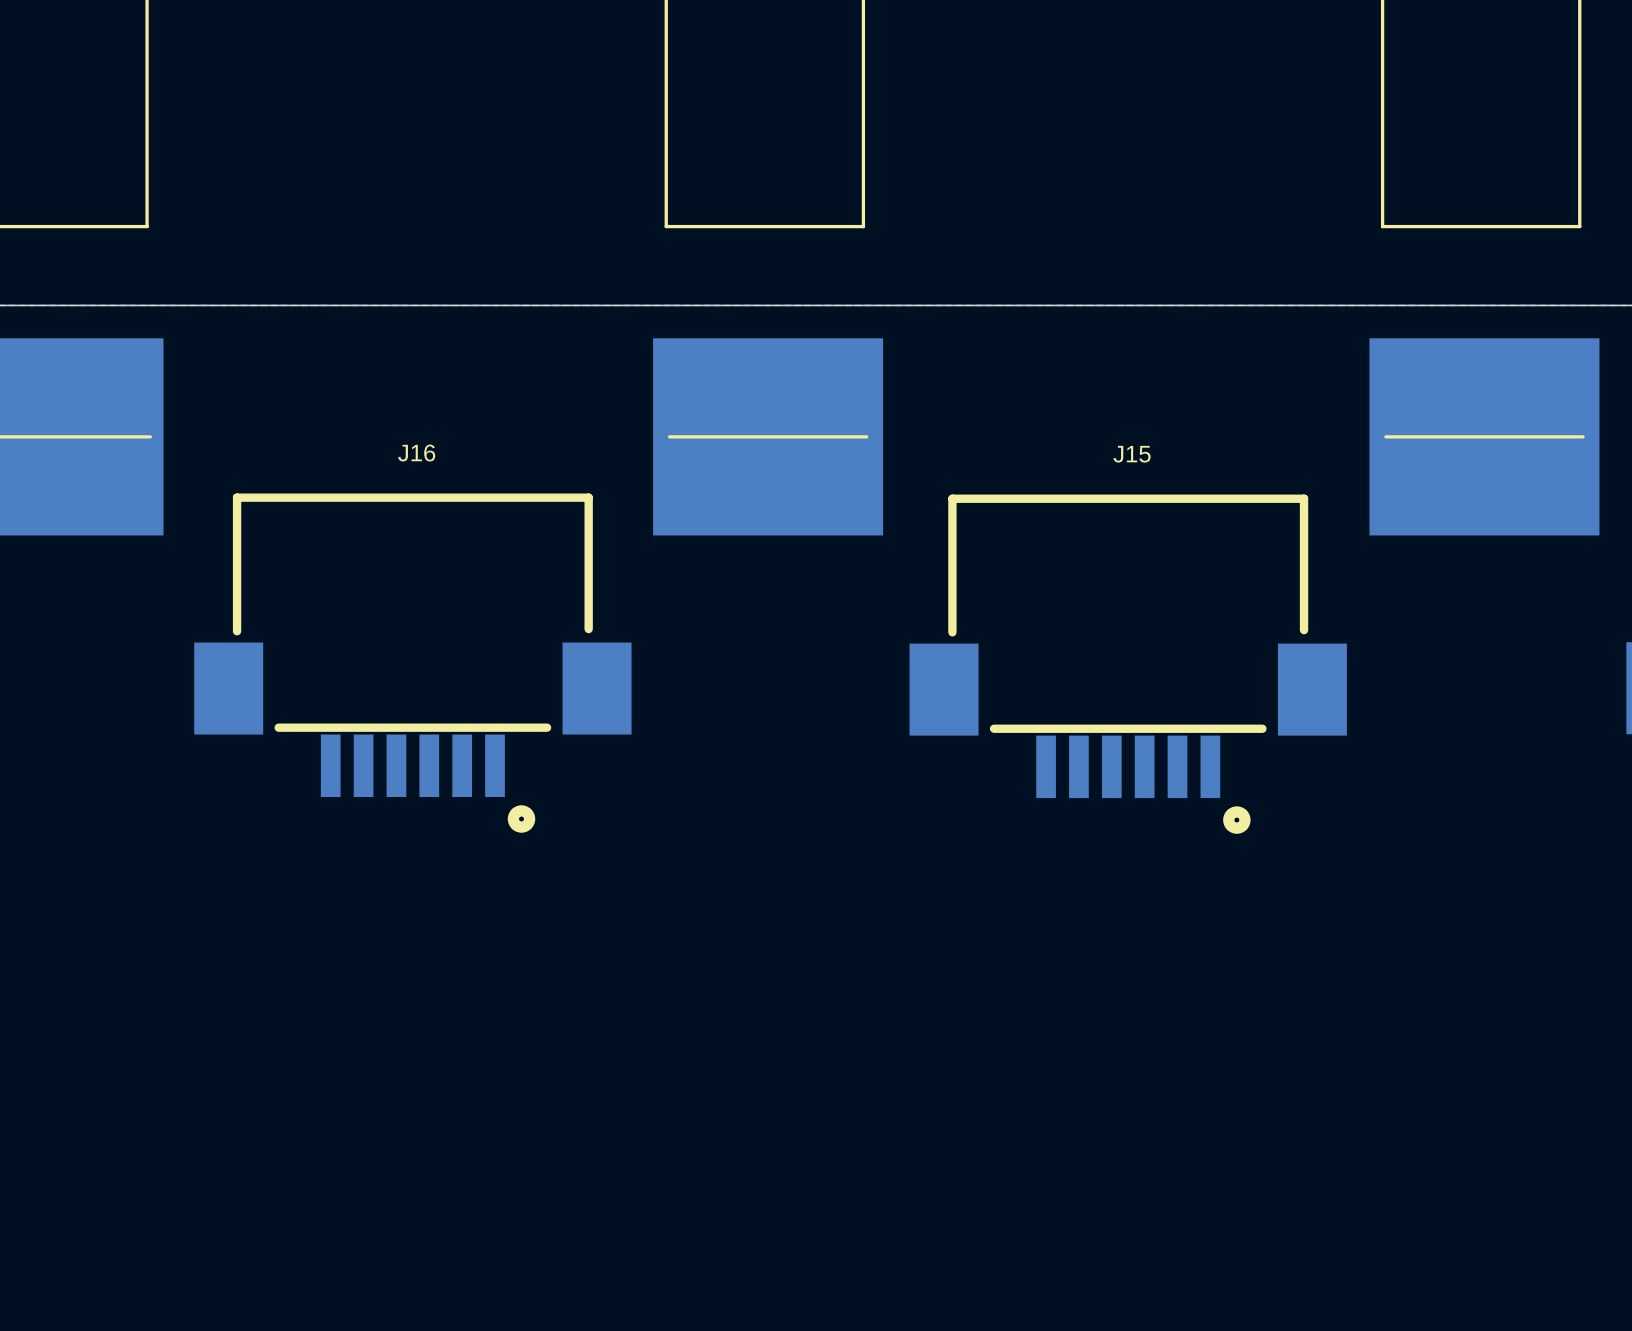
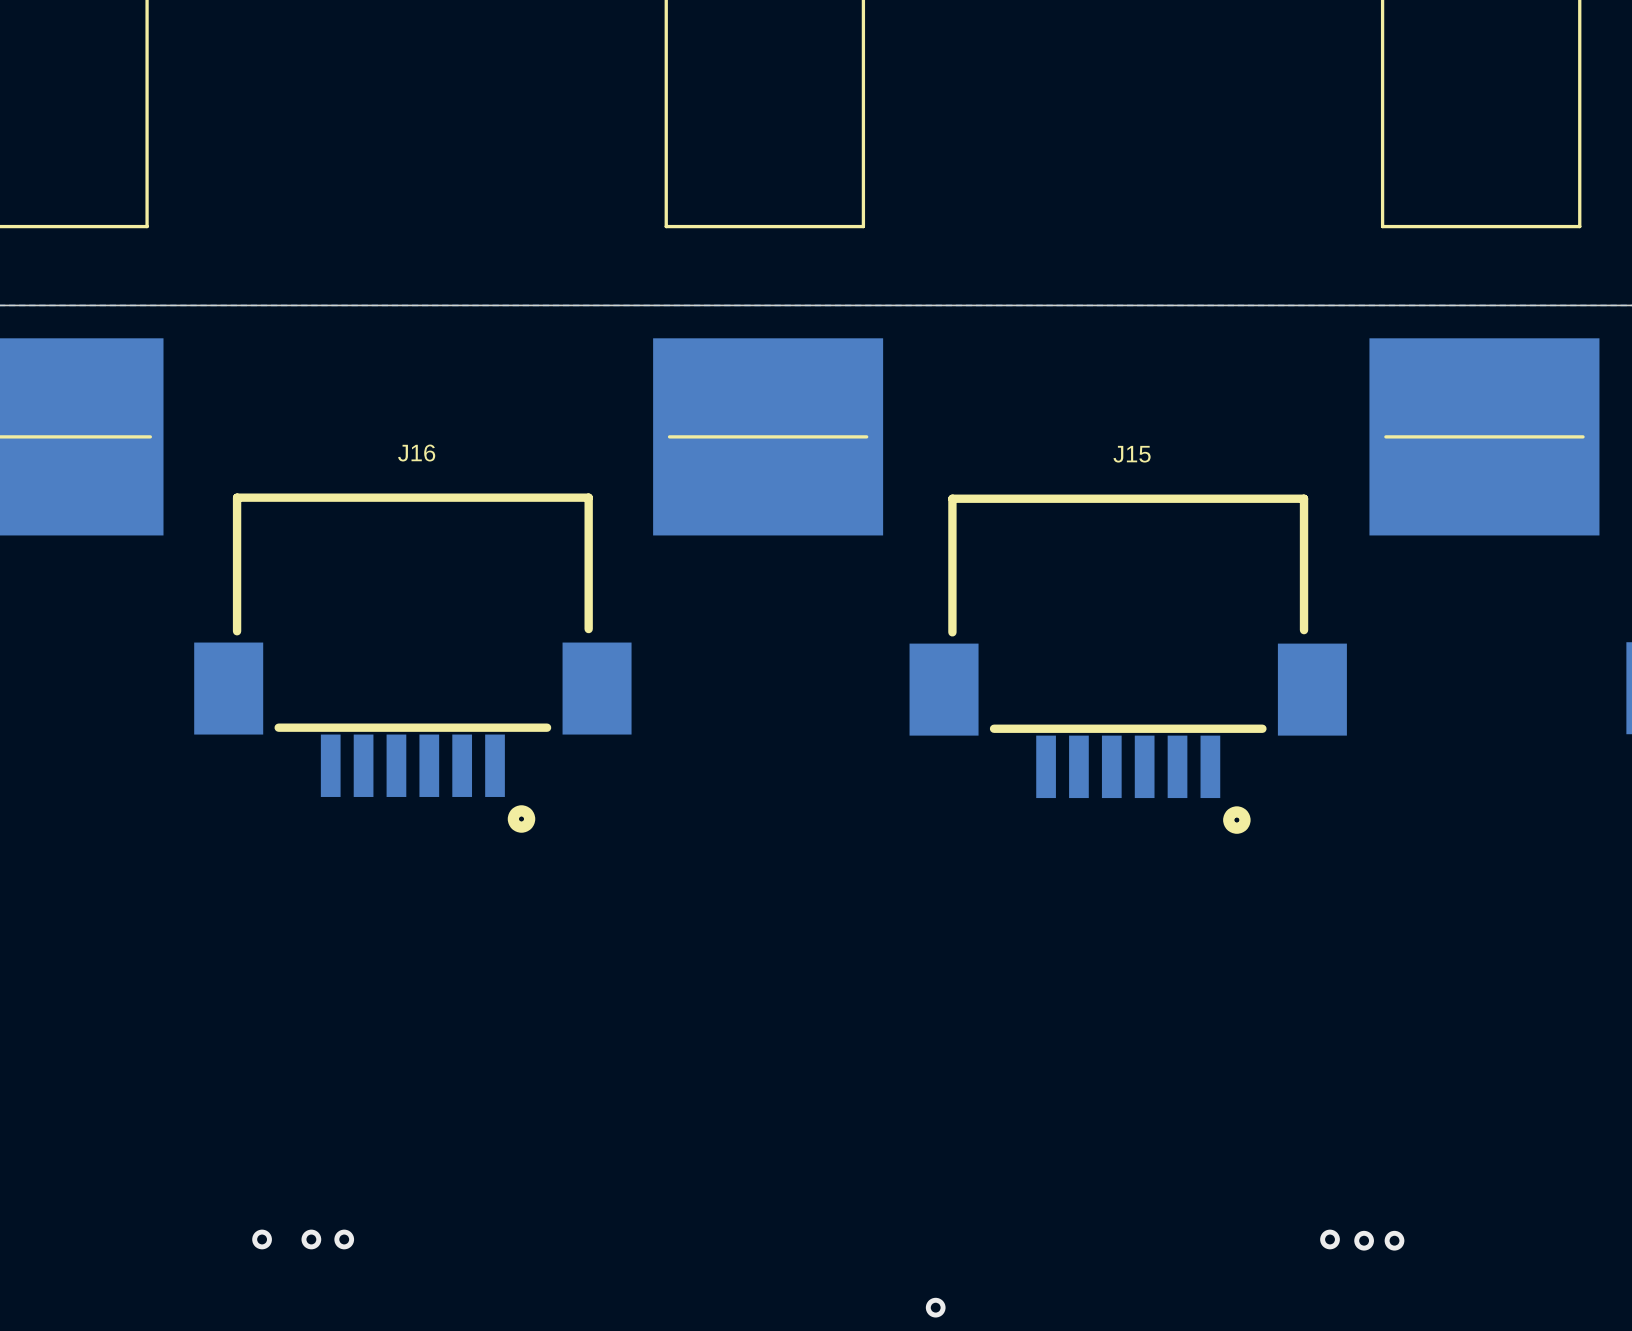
via: none -> (262, 1239)
via: none -> (311, 1239)
via: none -> (344, 1239)
via: none -> (1330, 1239)
via: none -> (1364, 1240)
via: none -> (1394, 1240)
via: none -> (935, 1307)

